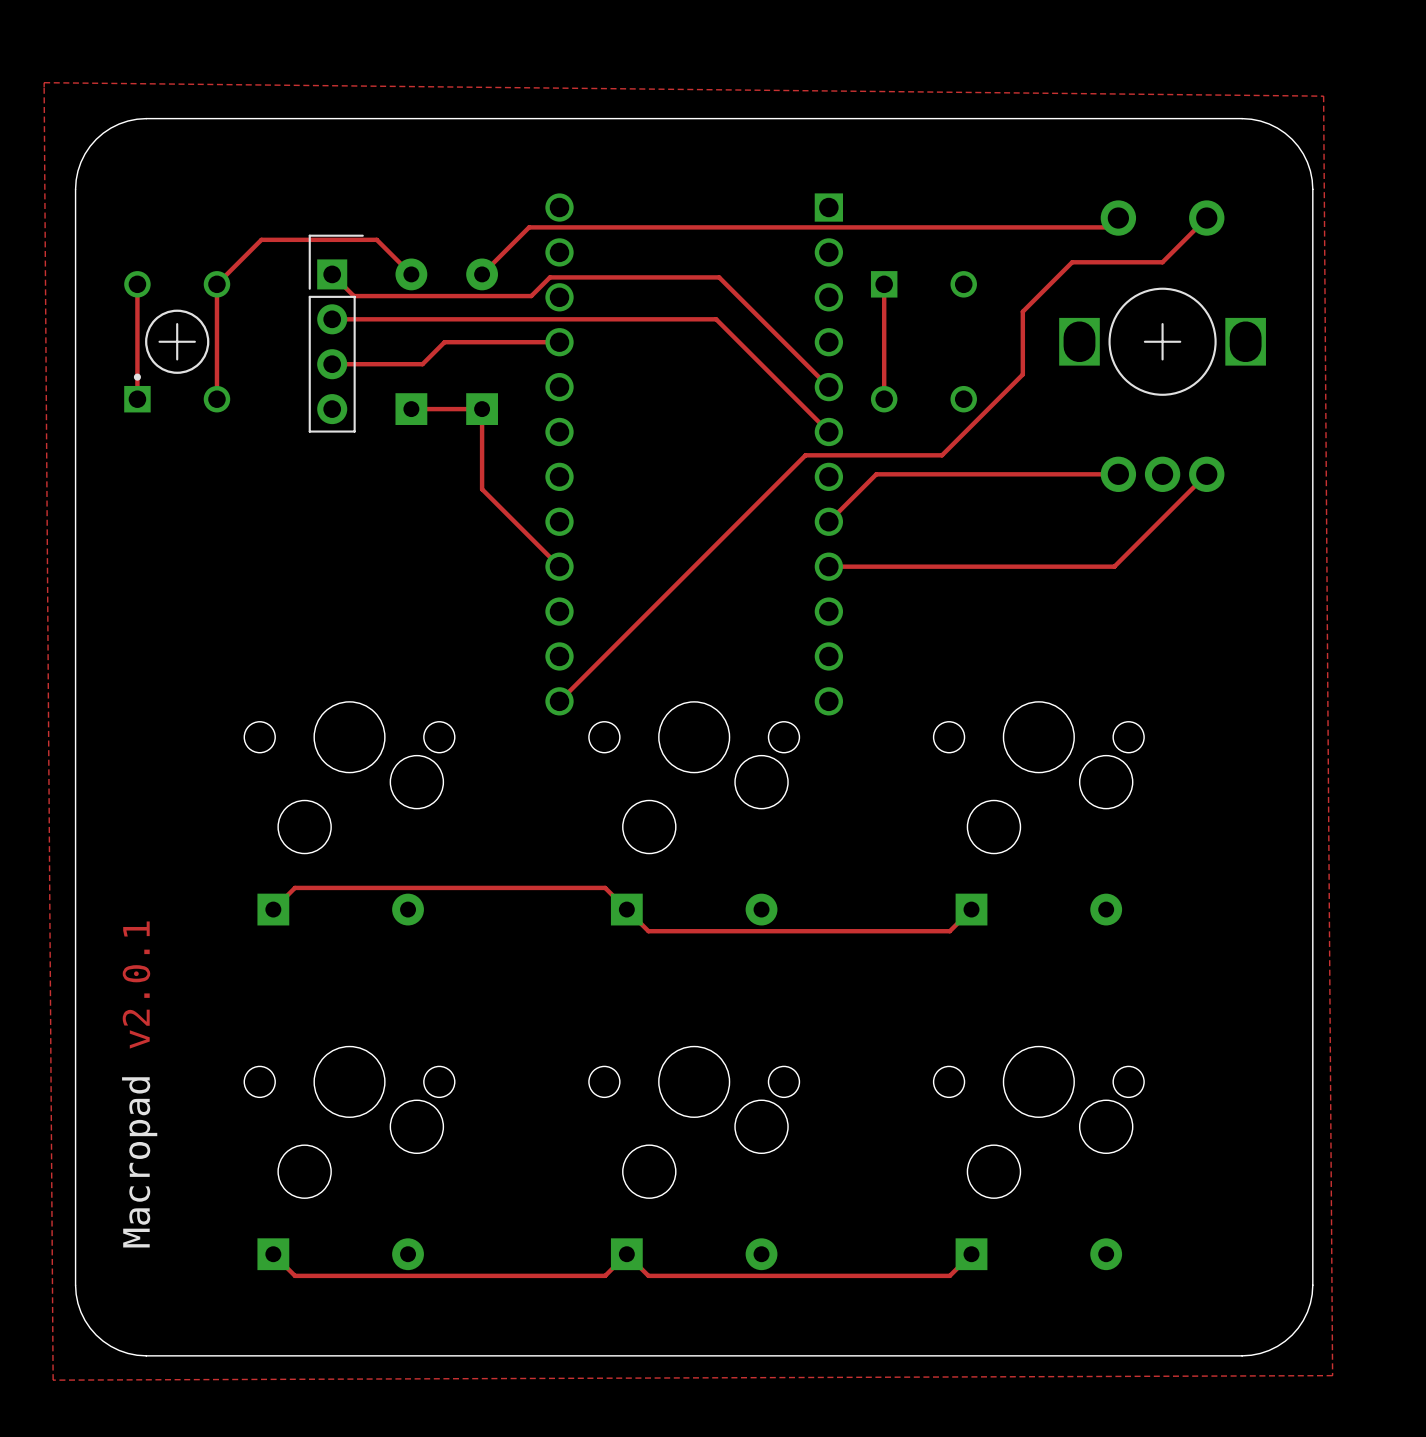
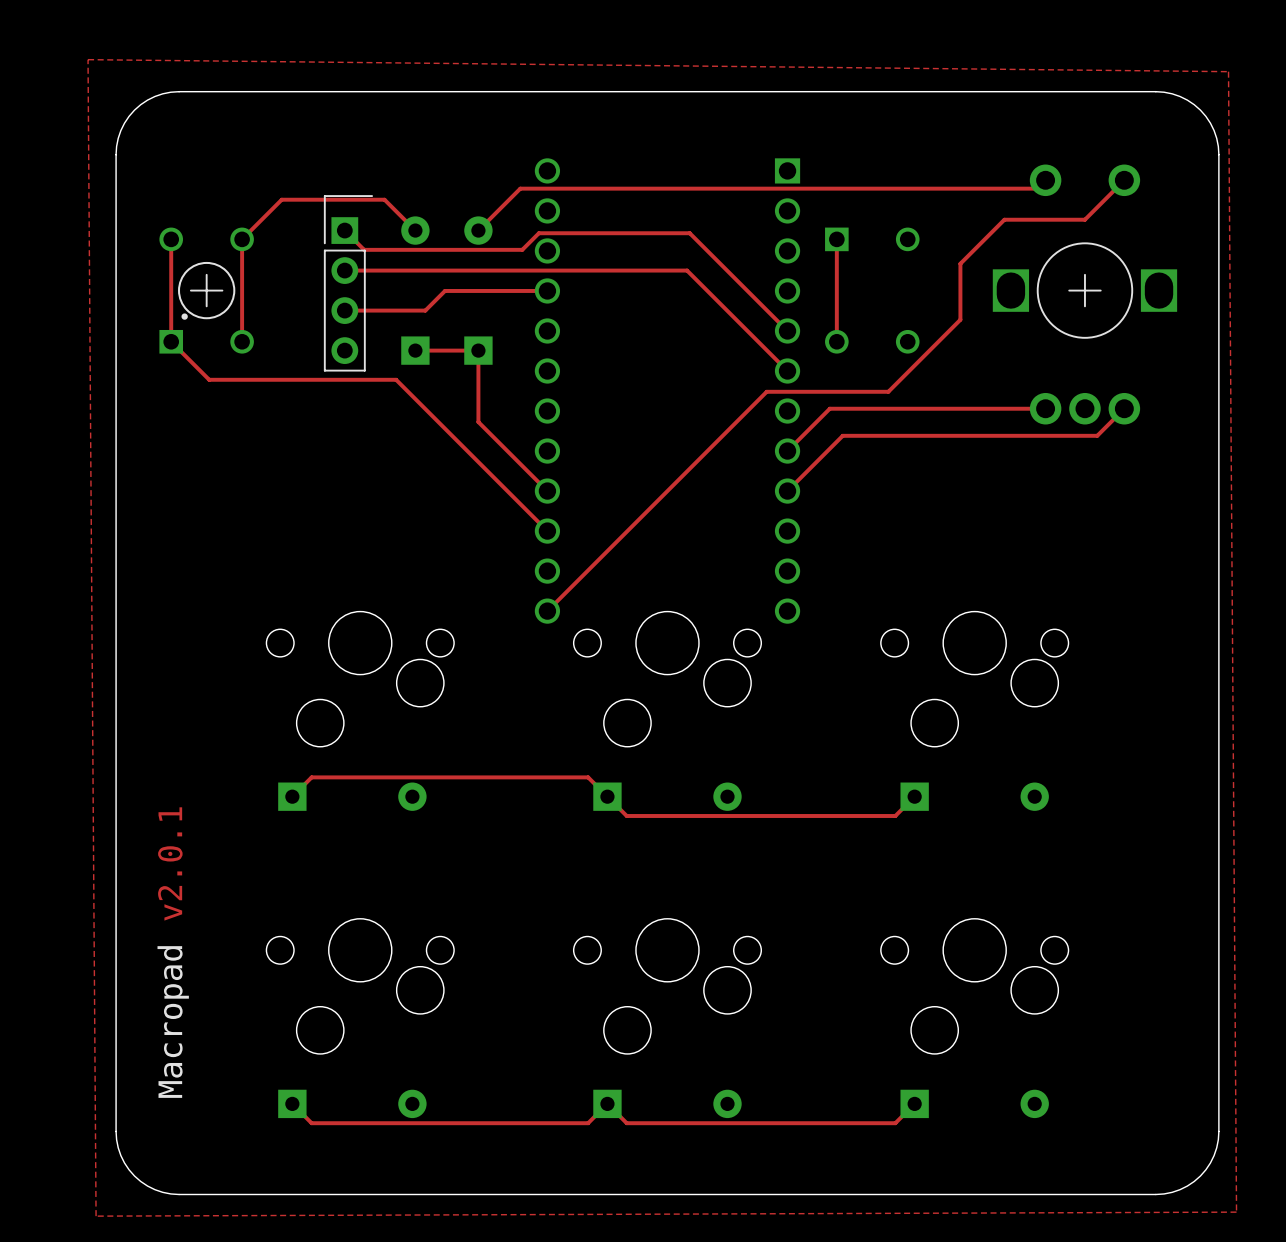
part footprint: [124, 271, 231, 413] -> [159, 227, 254, 354]
track: none -> (171, 341) (209, 379) (396, 379) (547, 531)
track: (1176, 504) (1114, 566) (828, 566) -> (1097, 435) (842, 435) (787, 491)

